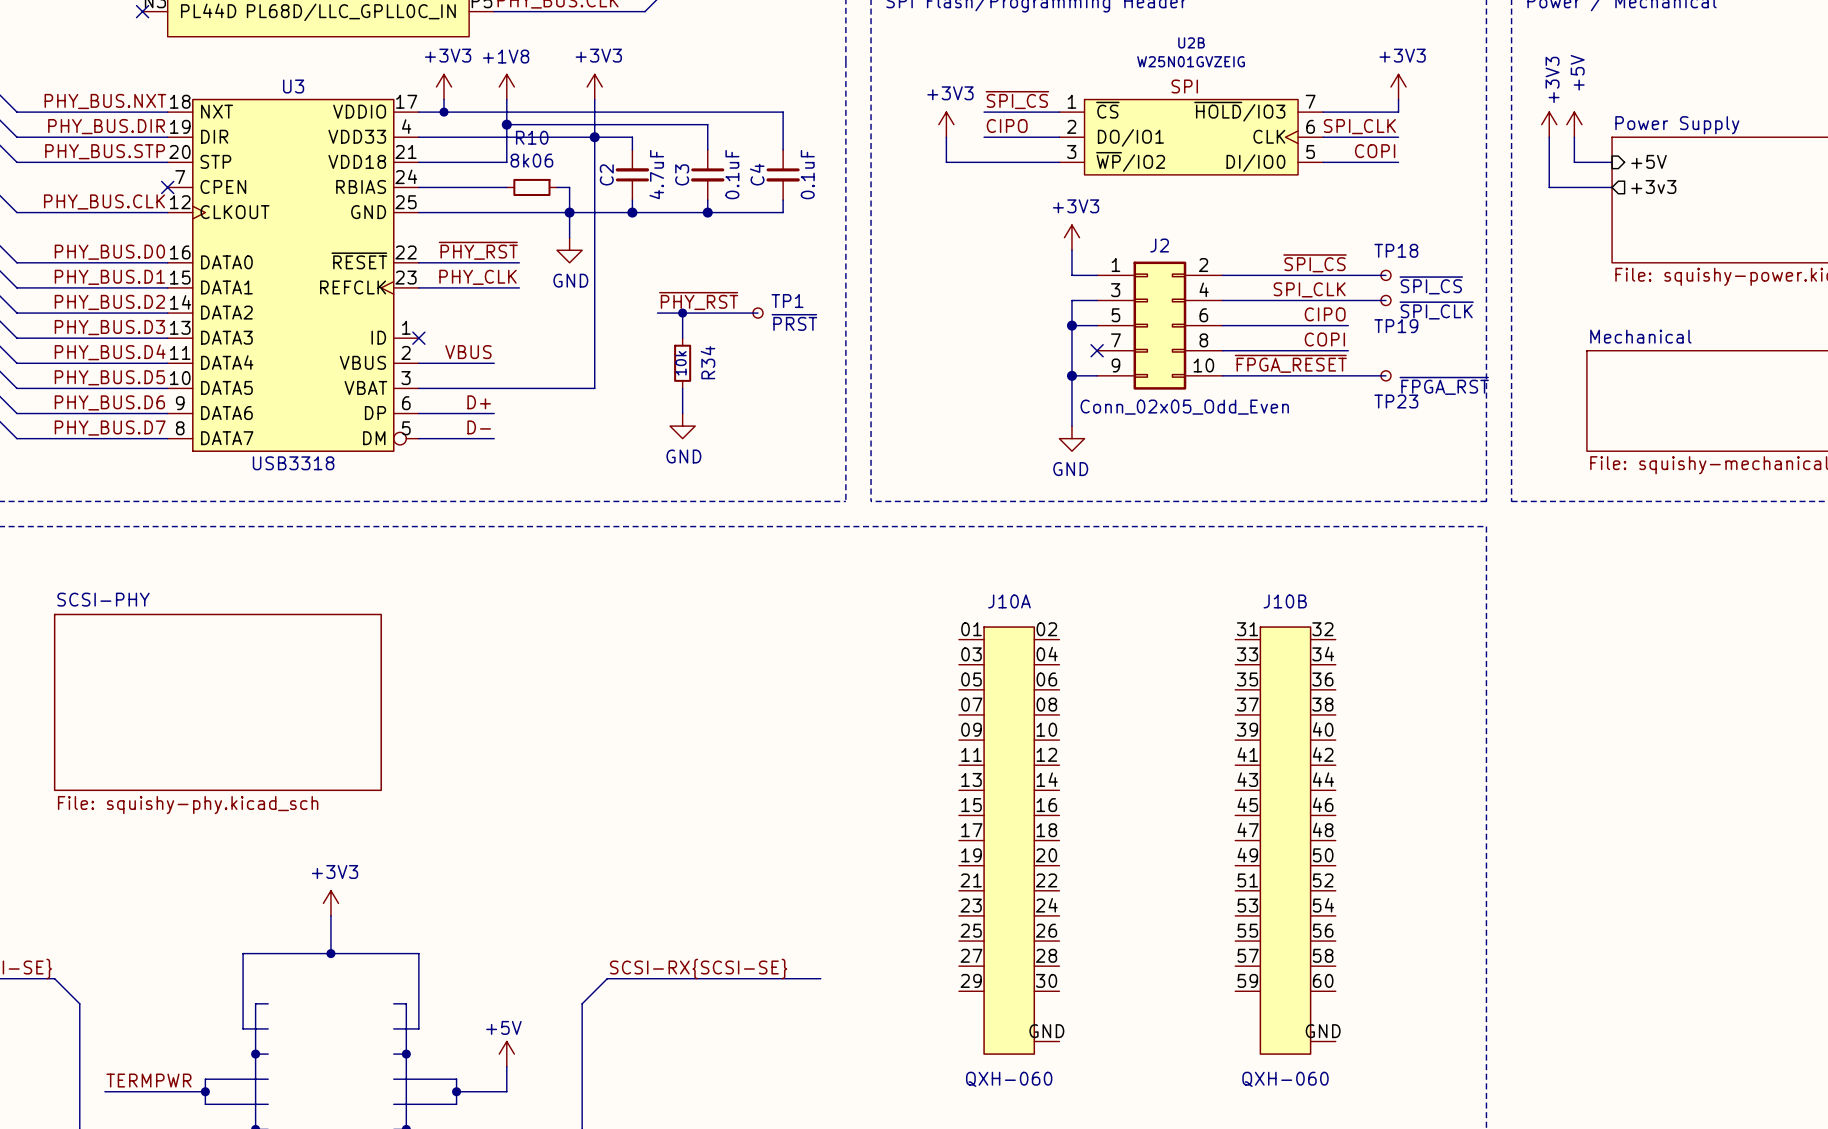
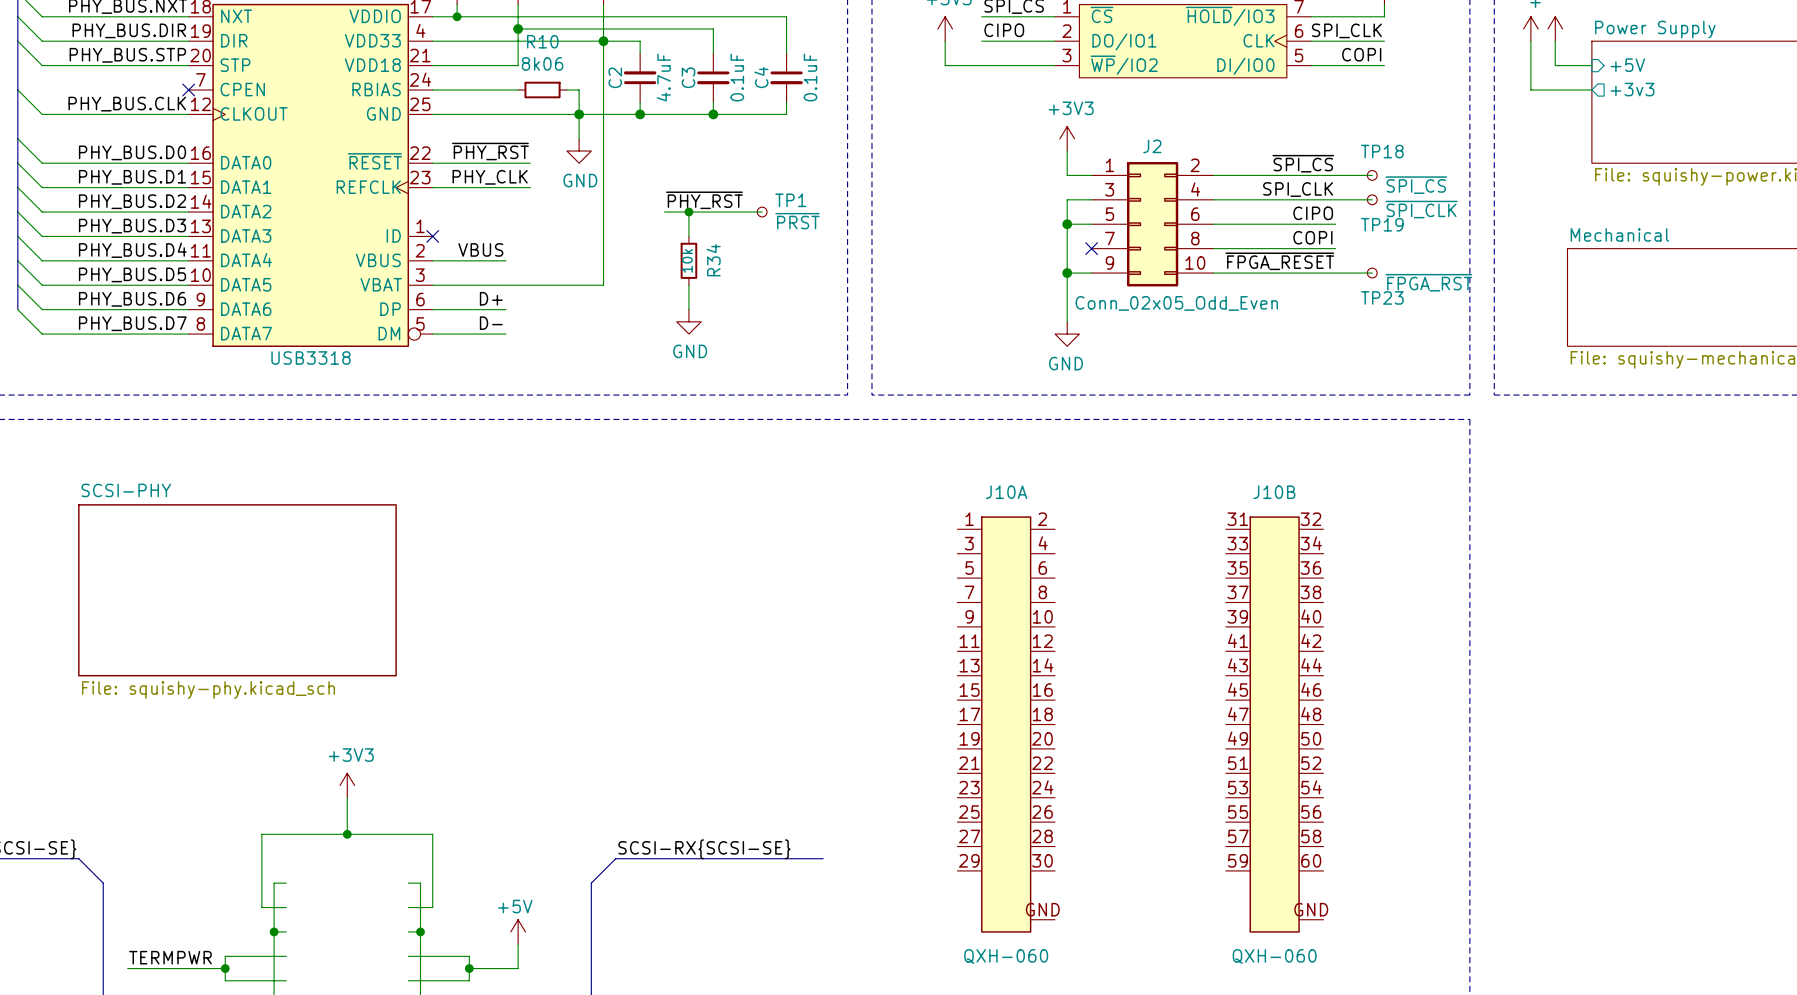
J10A symbol: [958, 626, 1060, 1055] -> [957, 516, 1056, 933]

